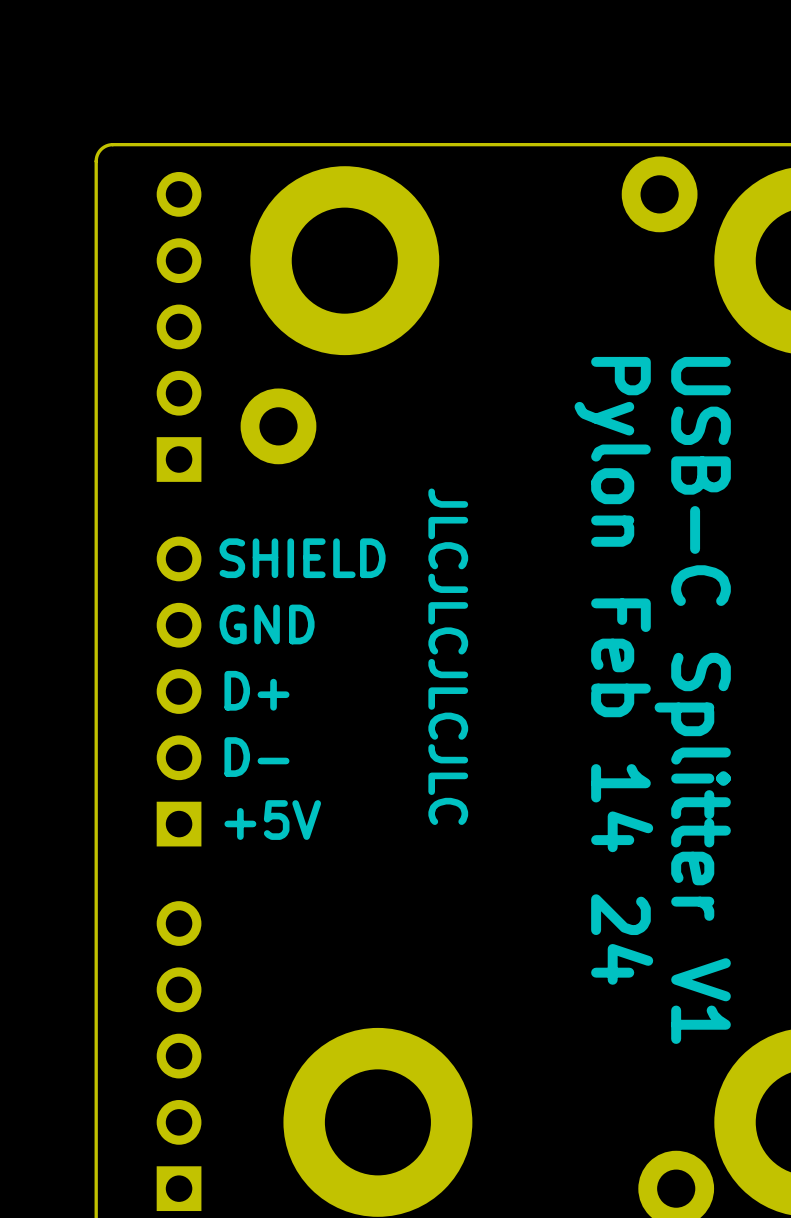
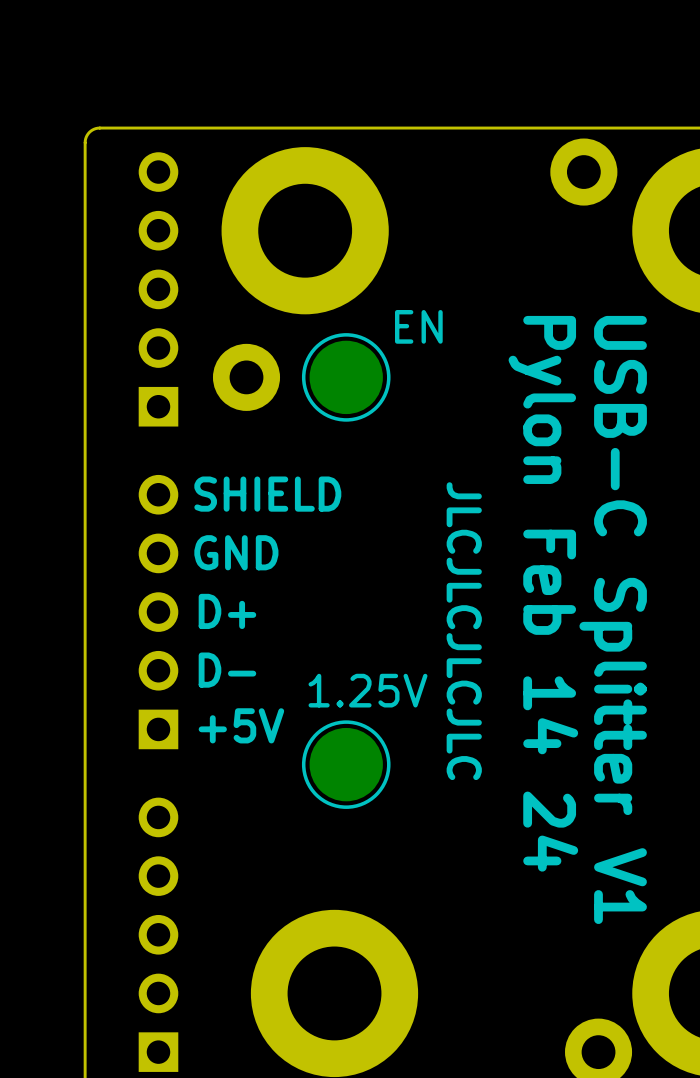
text: none -> EN (418, 326)
part: none -> (346, 377)
text position: JLCJLCJLCJLC (448, 656) -> JLCJLCJLCJLC (464, 631)
text: none -> 1.25V (367, 690)
part: none -> (346, 764)

